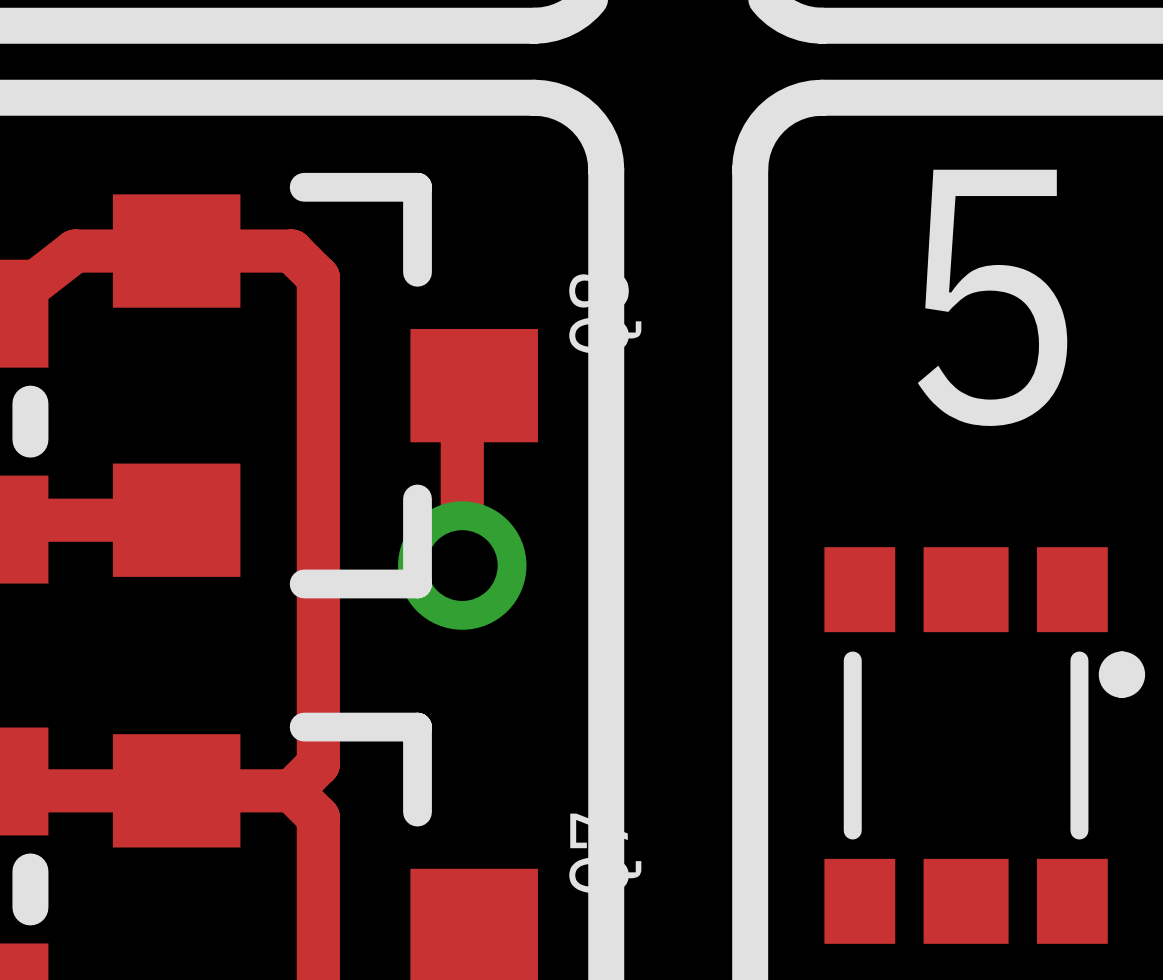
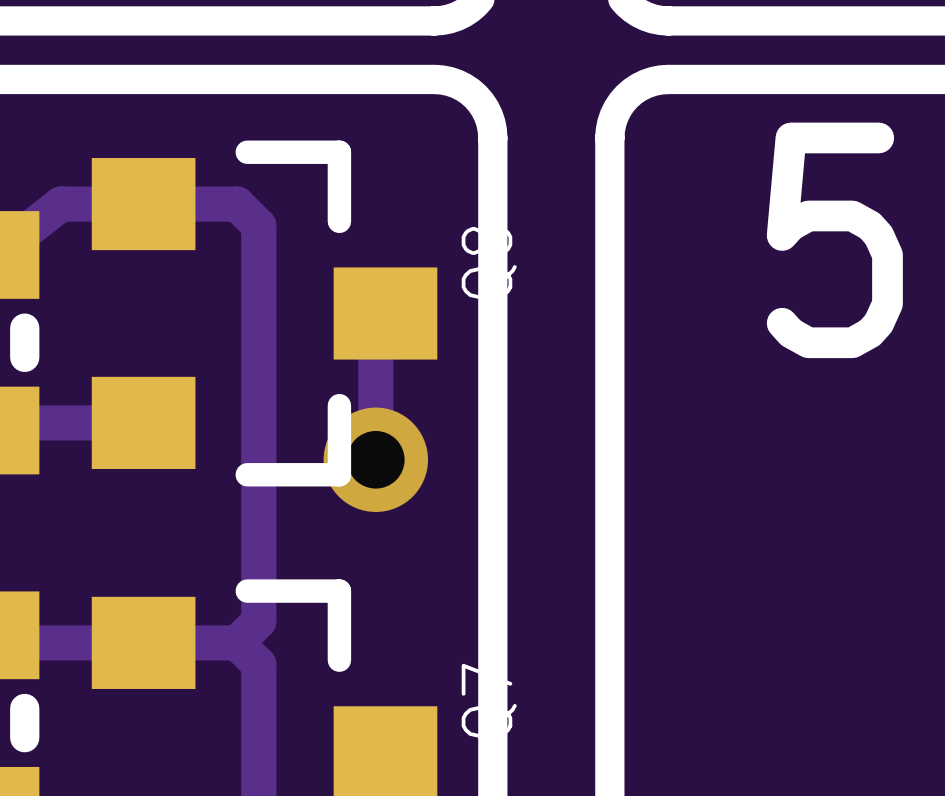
part: (984, 745) -> none

